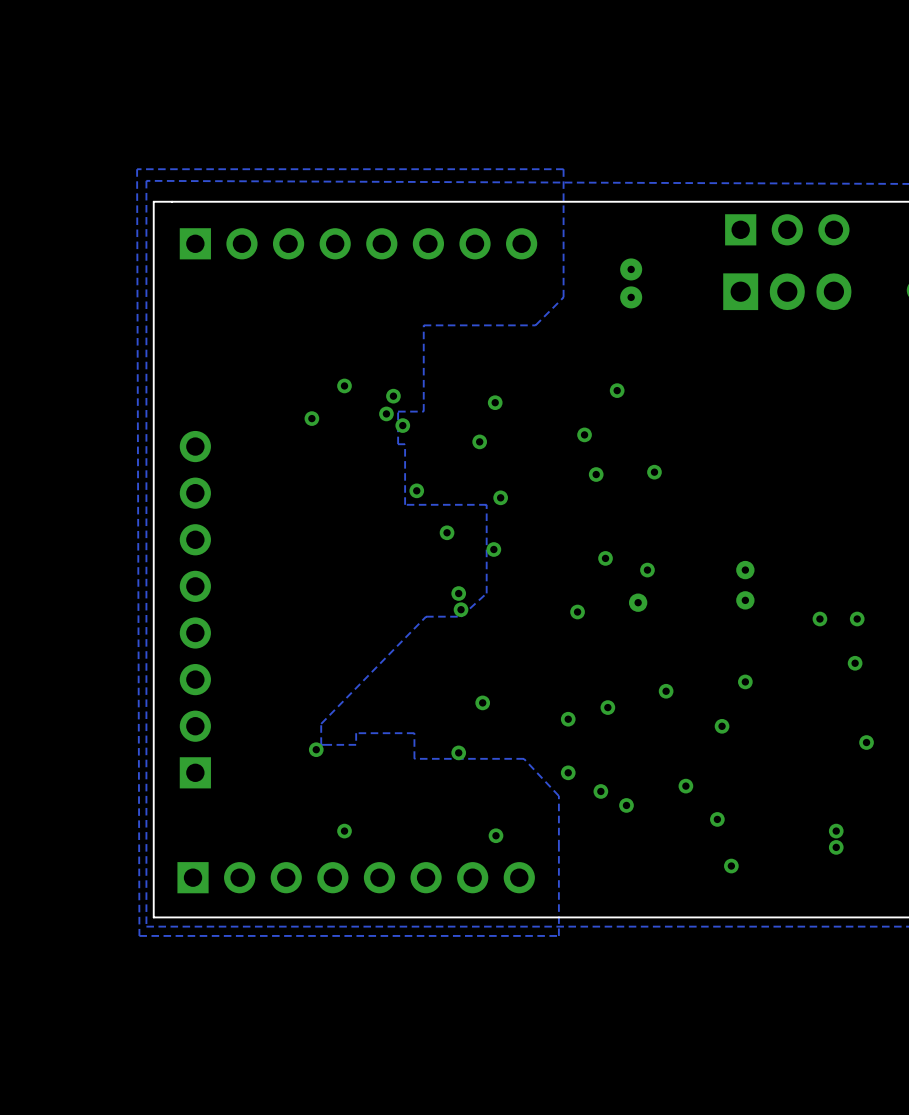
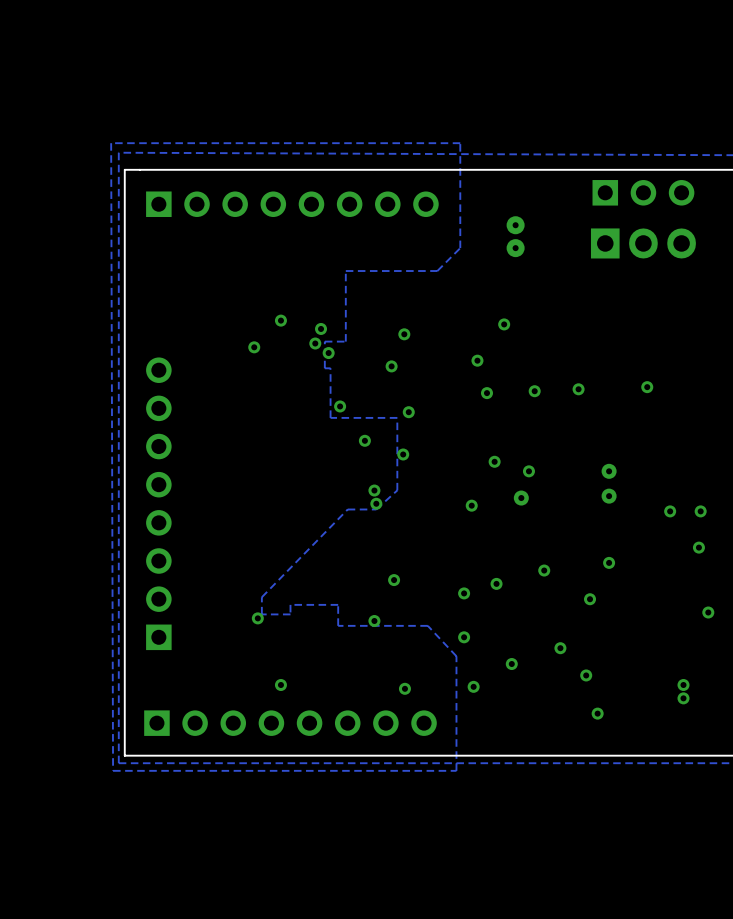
via: none -> (647, 387)
via: none -> (578, 389)
via position: (600, 791) -> (473, 686)

